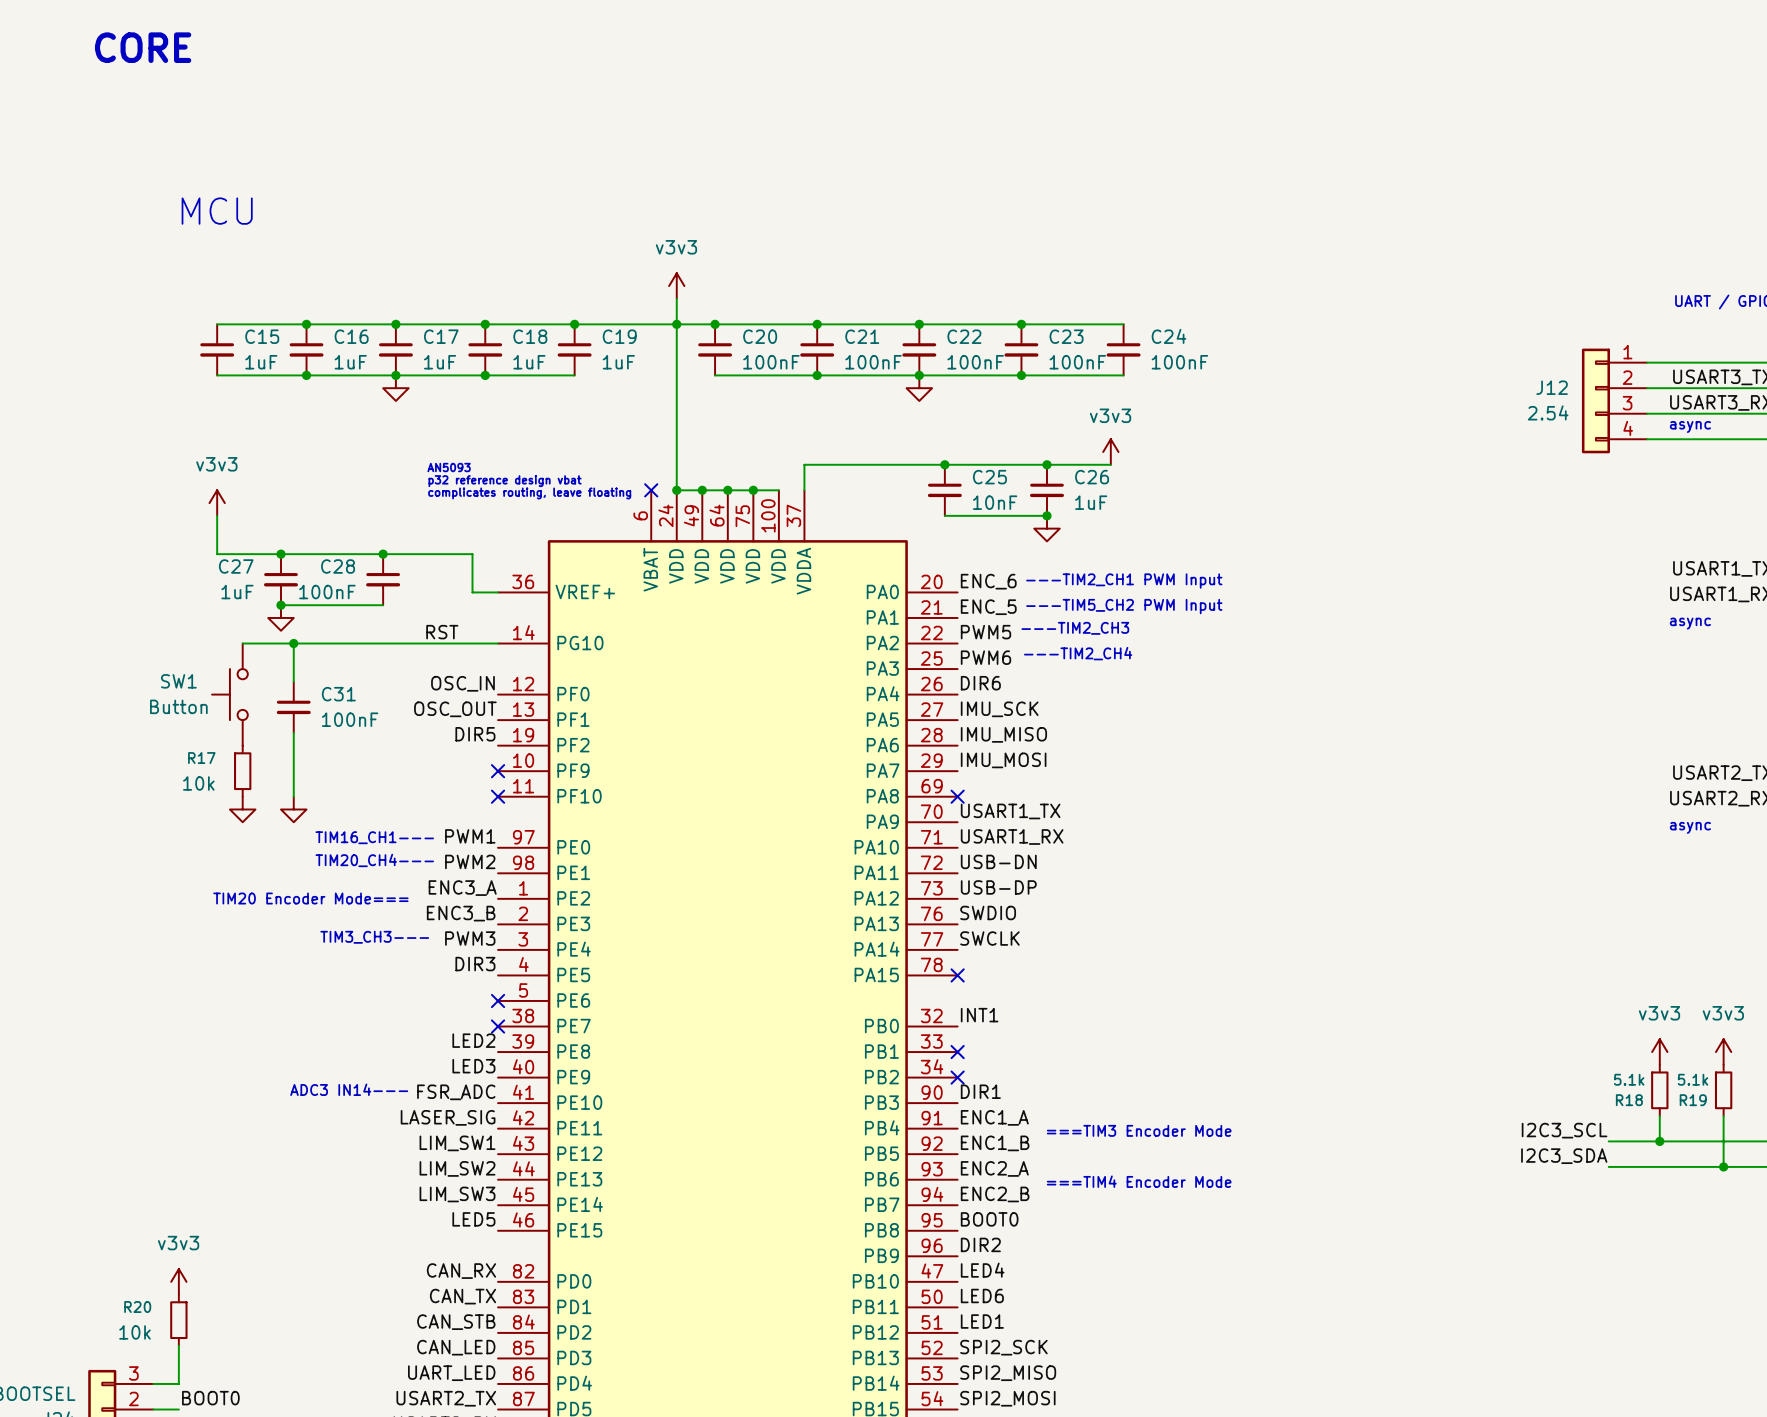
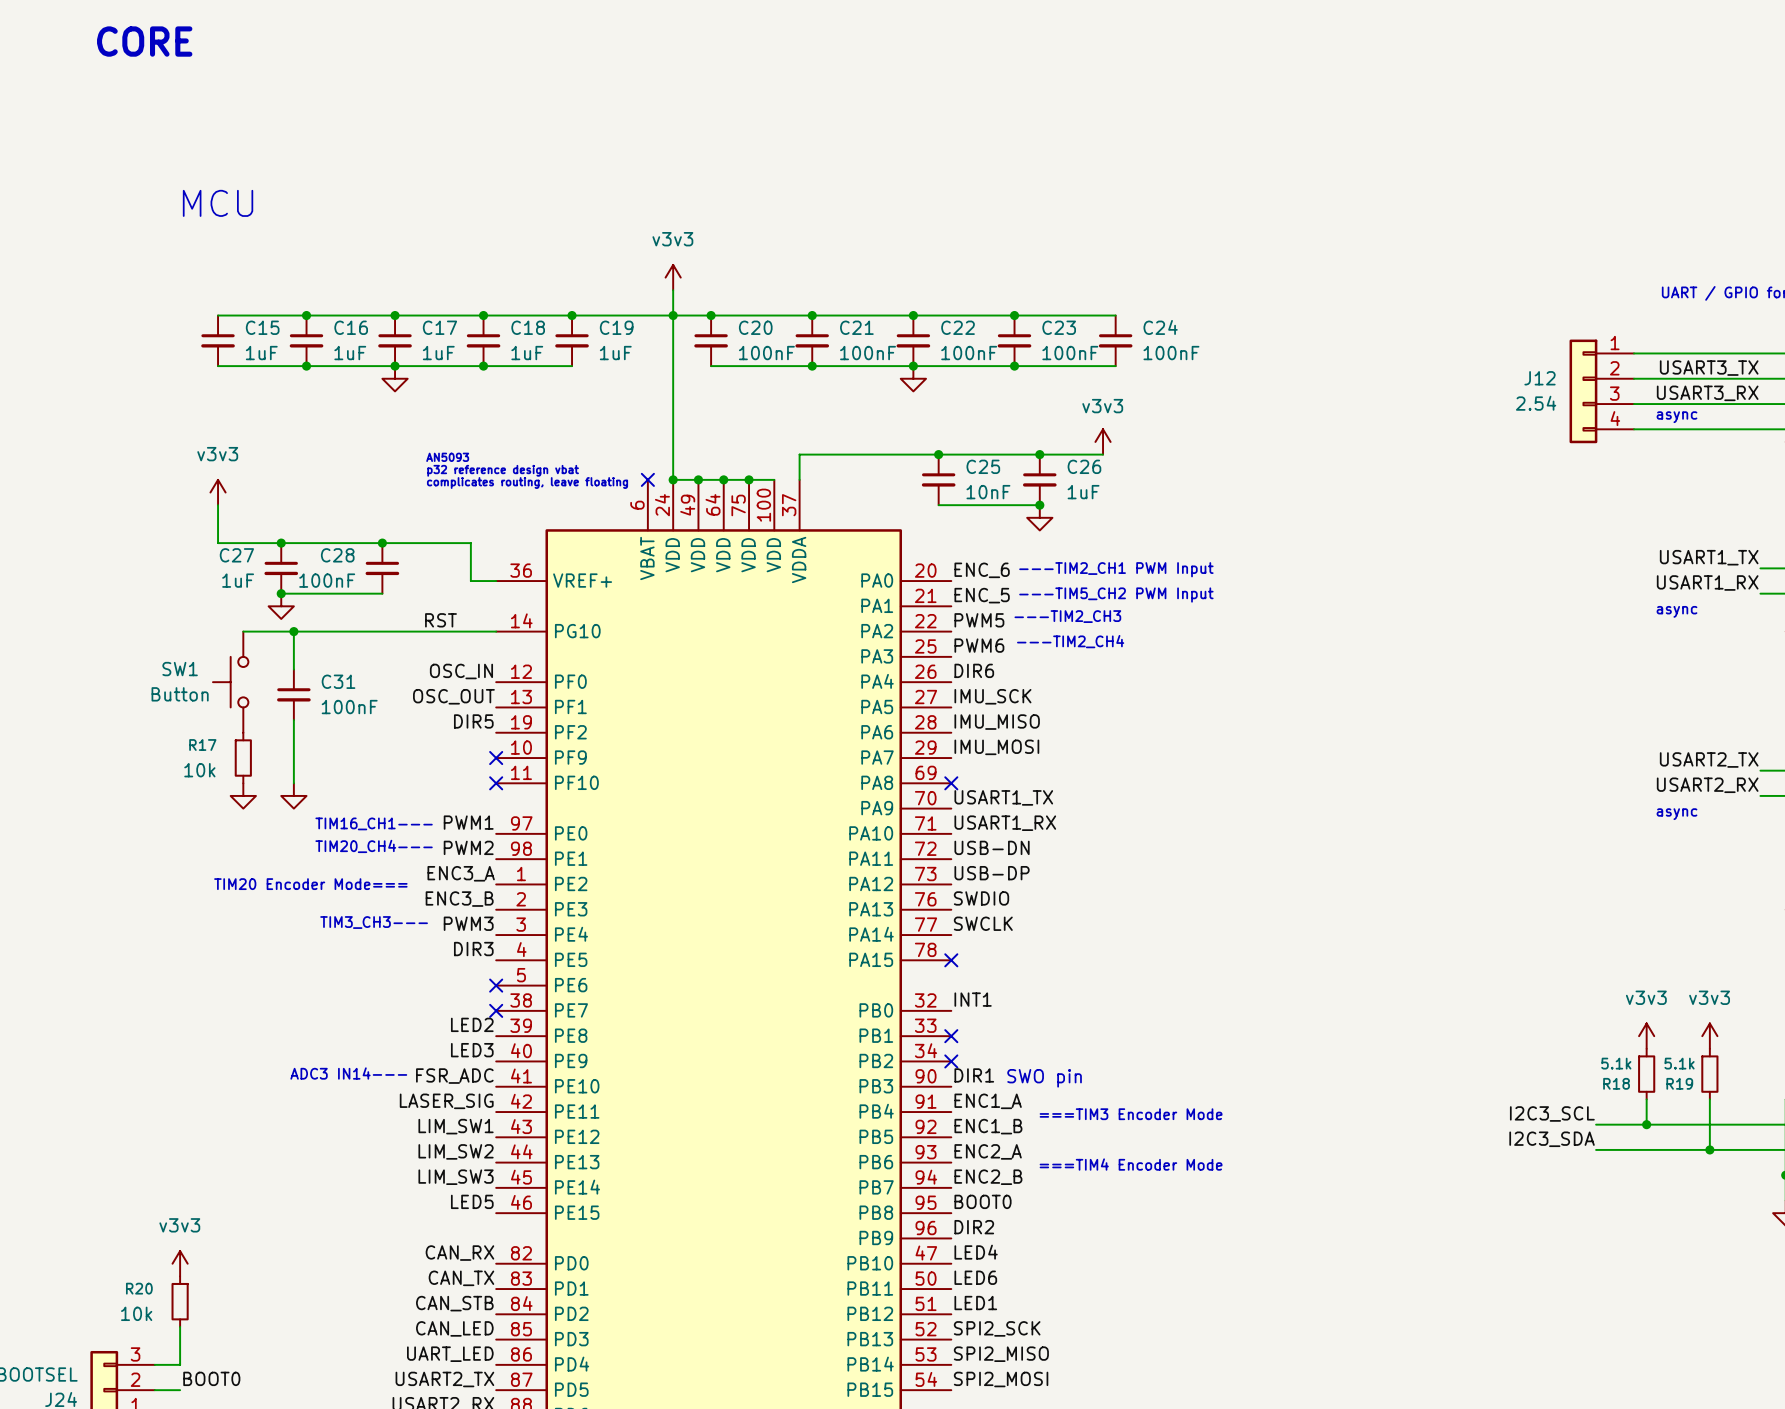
text: none -> SWO pin (1044, 1078)

